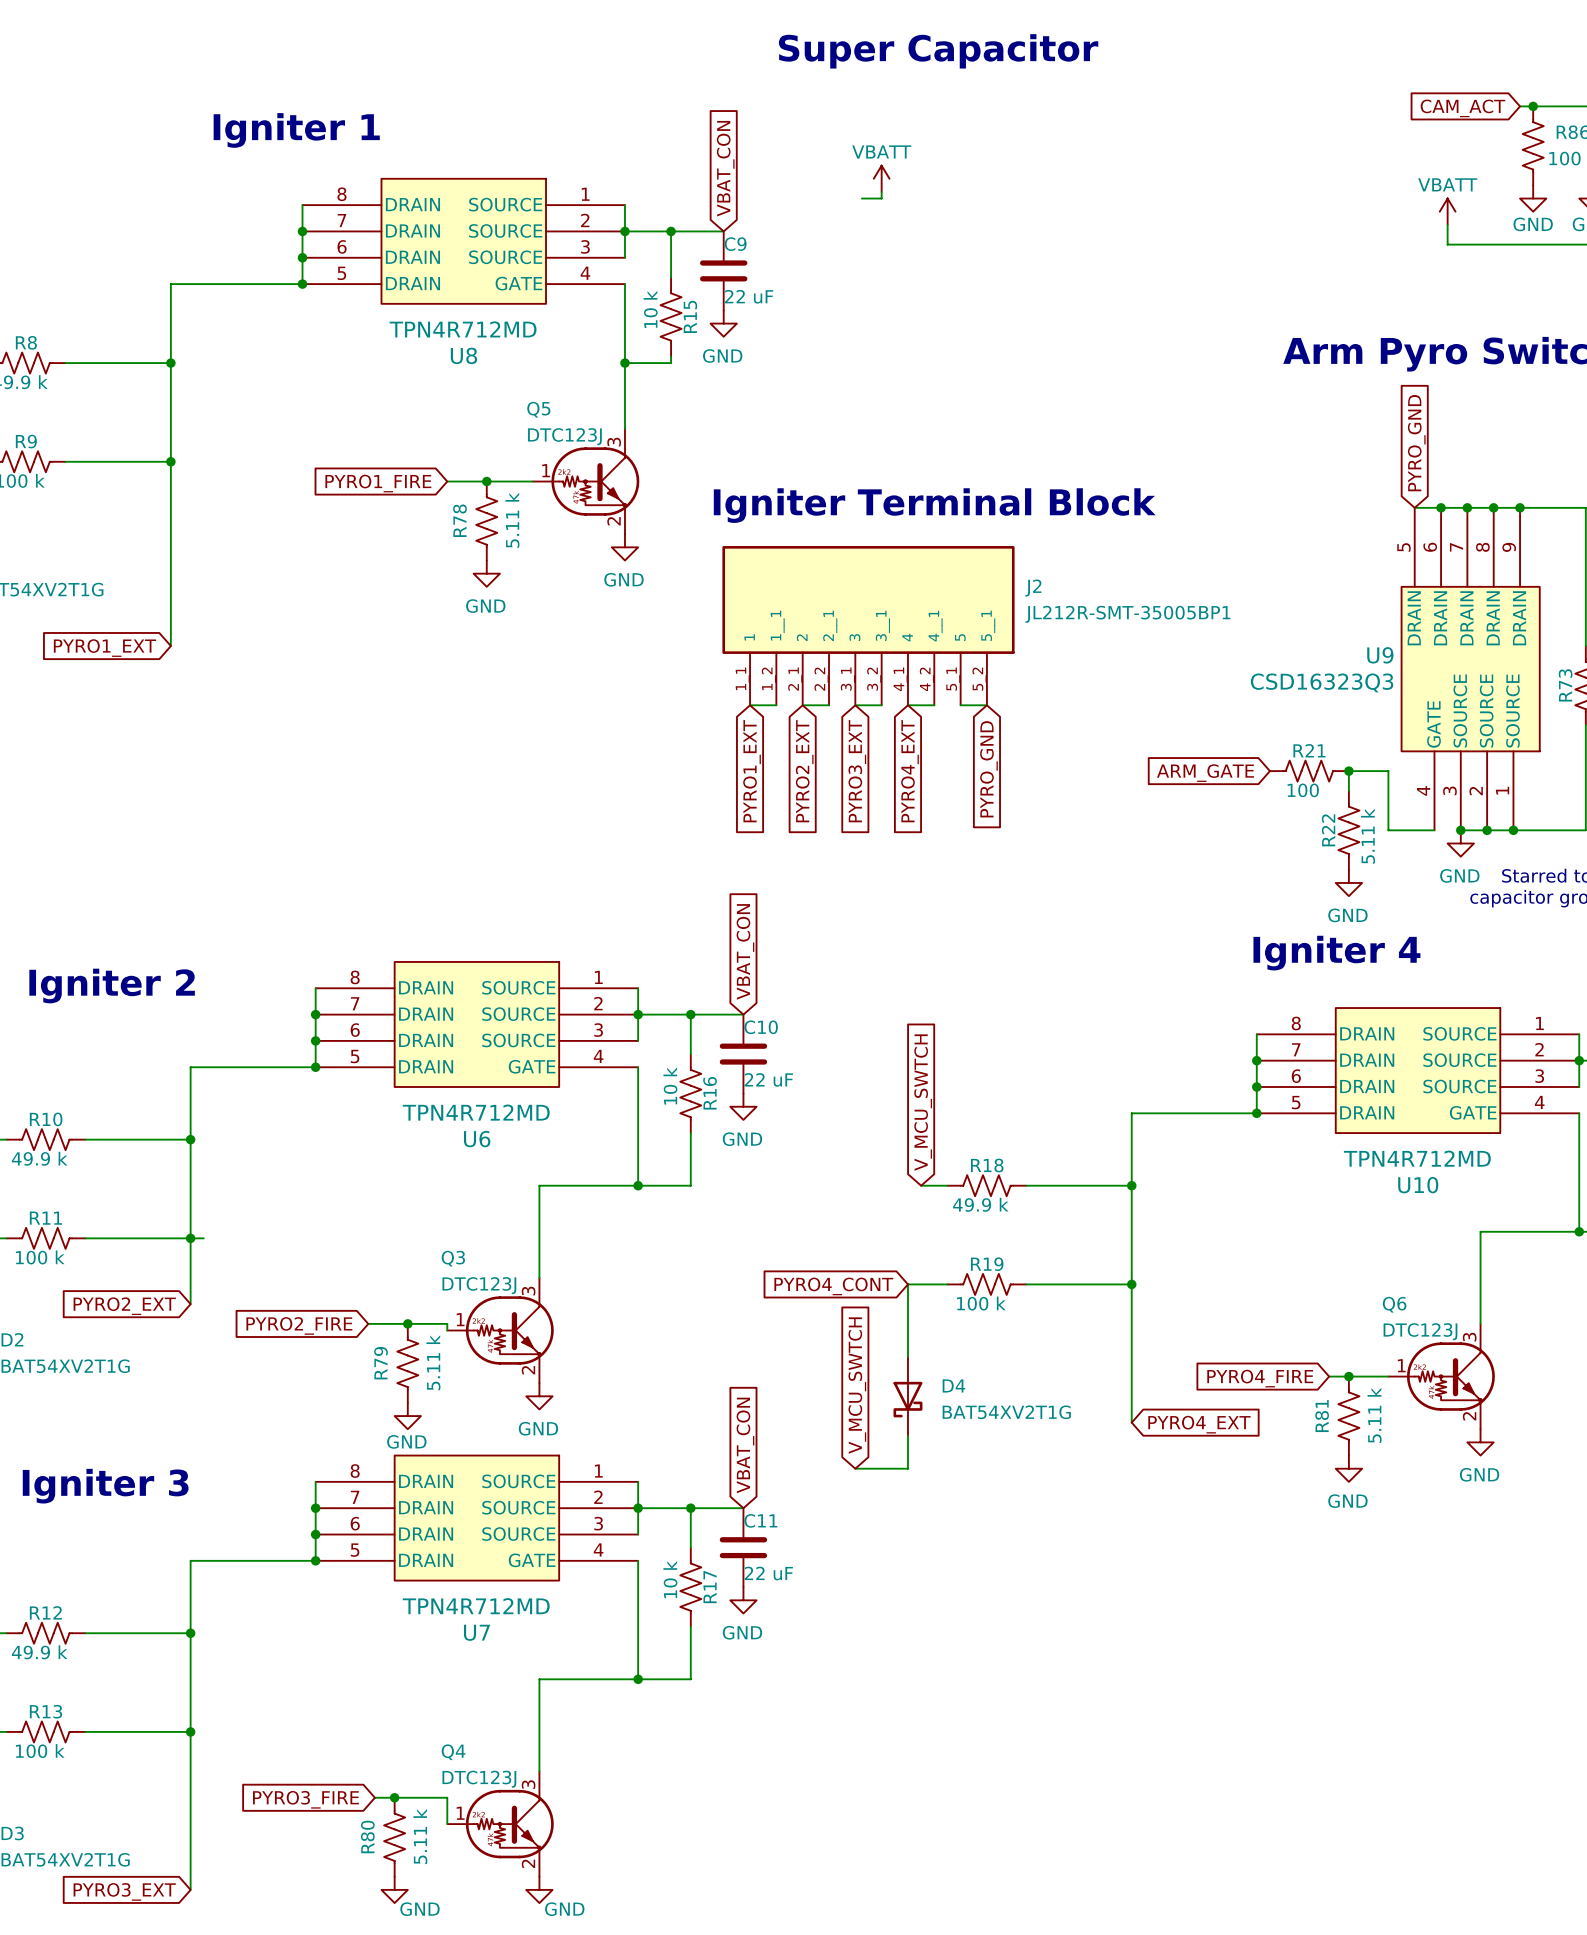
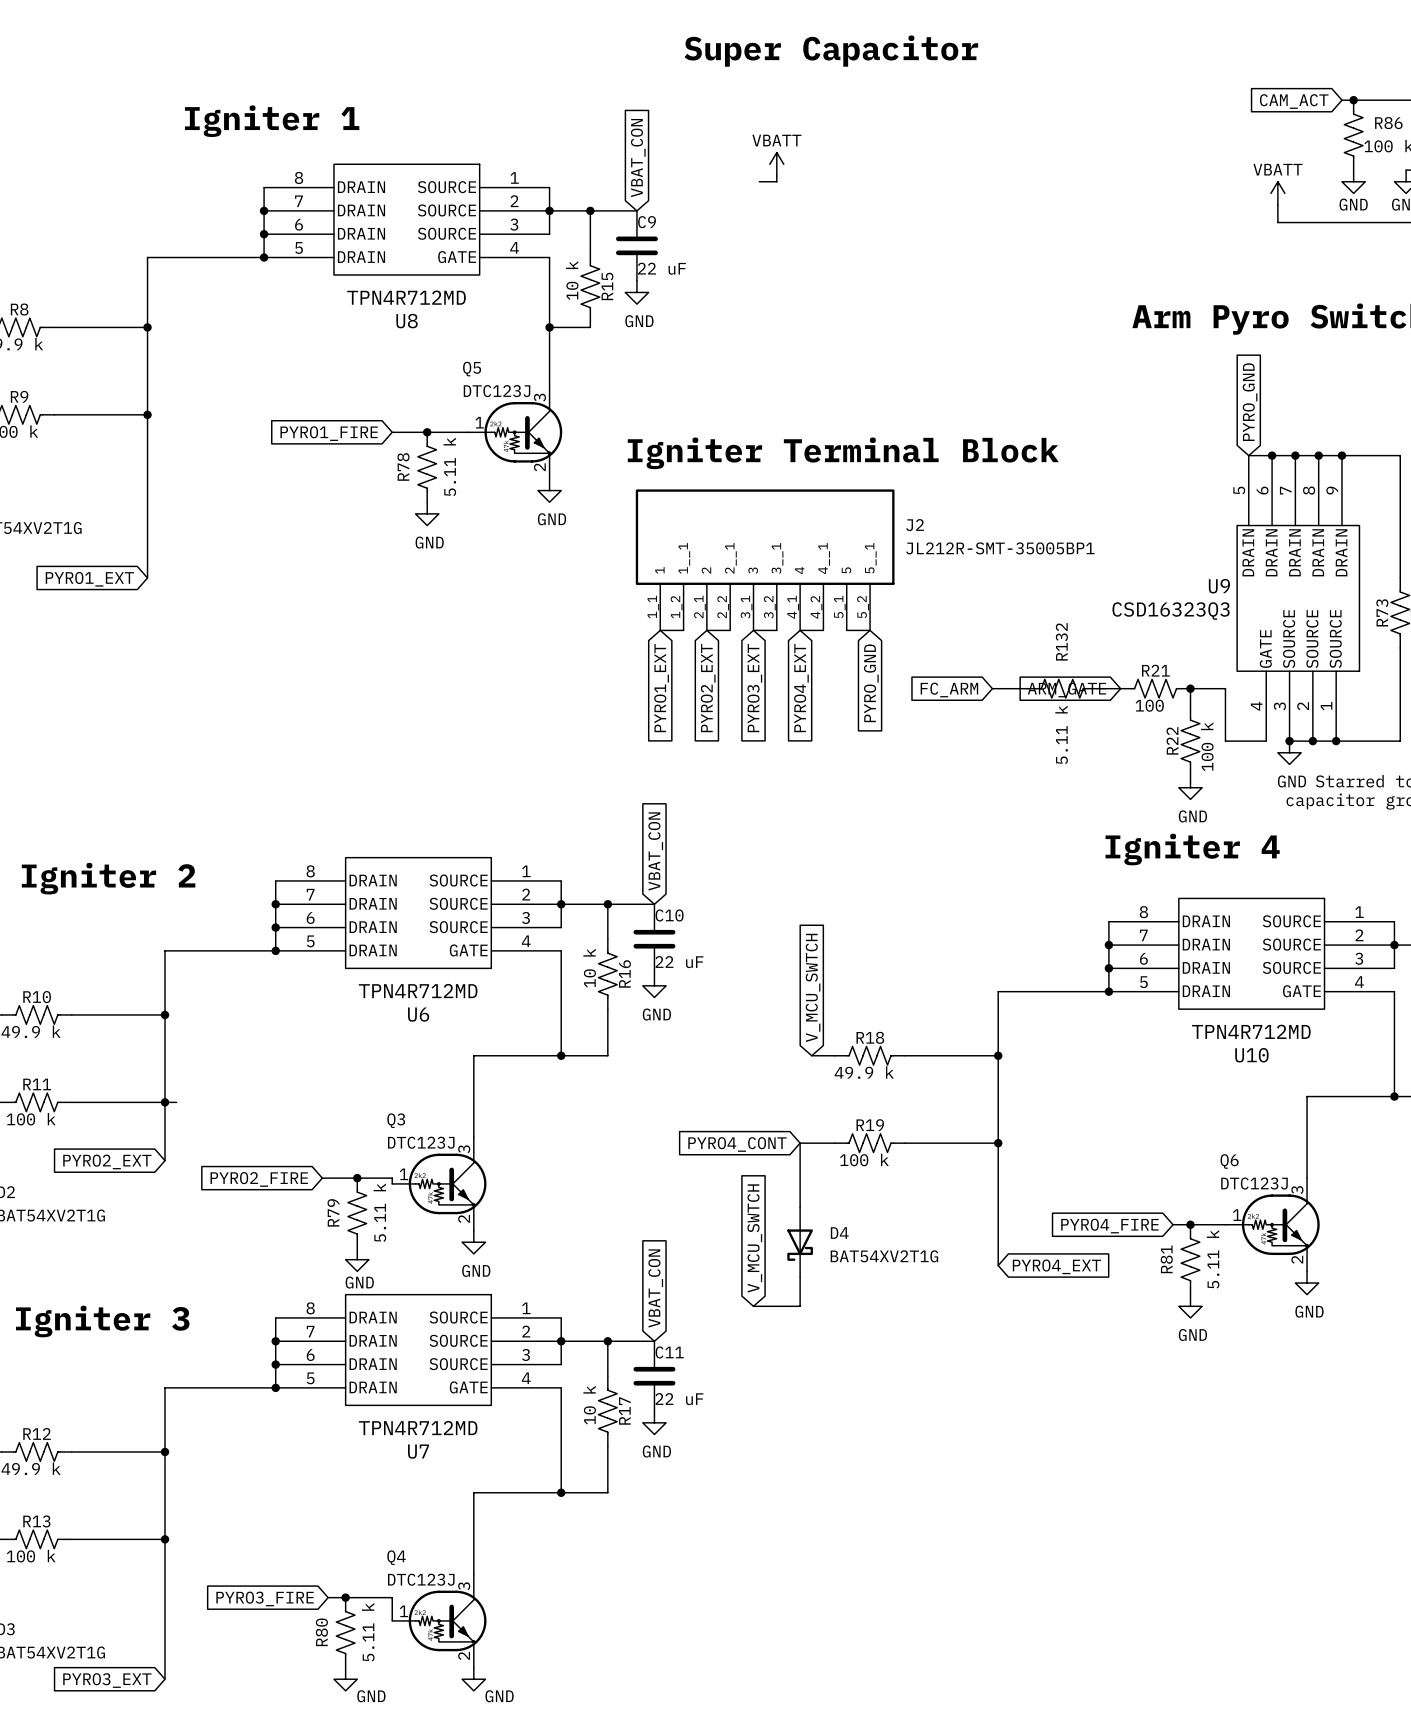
wire: none -> (992, 688) (1027, 688)
R132: none -> 5.11 k (1062, 688)
wire: none -> (1097, 688) (1120, 688)
global label: none -> FC_ARM (949, 689)
R22 value: 5.11 k (1368, 836) -> 100 k (1207, 746)

